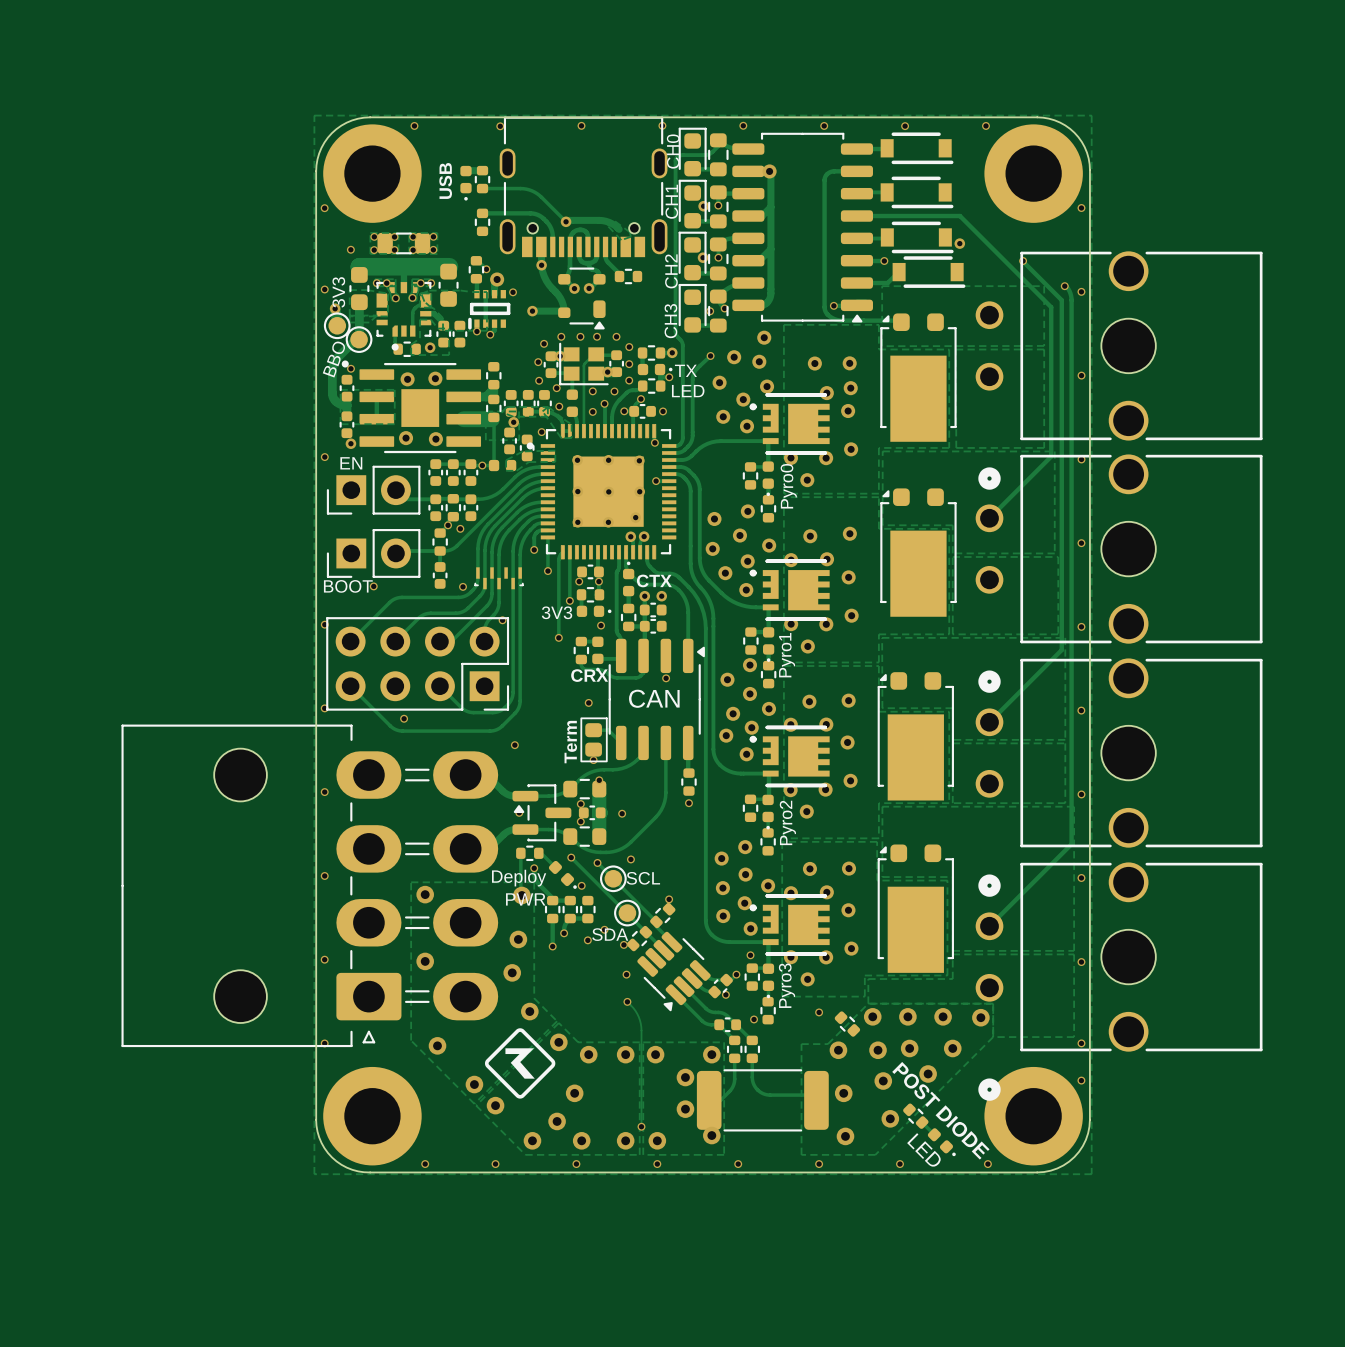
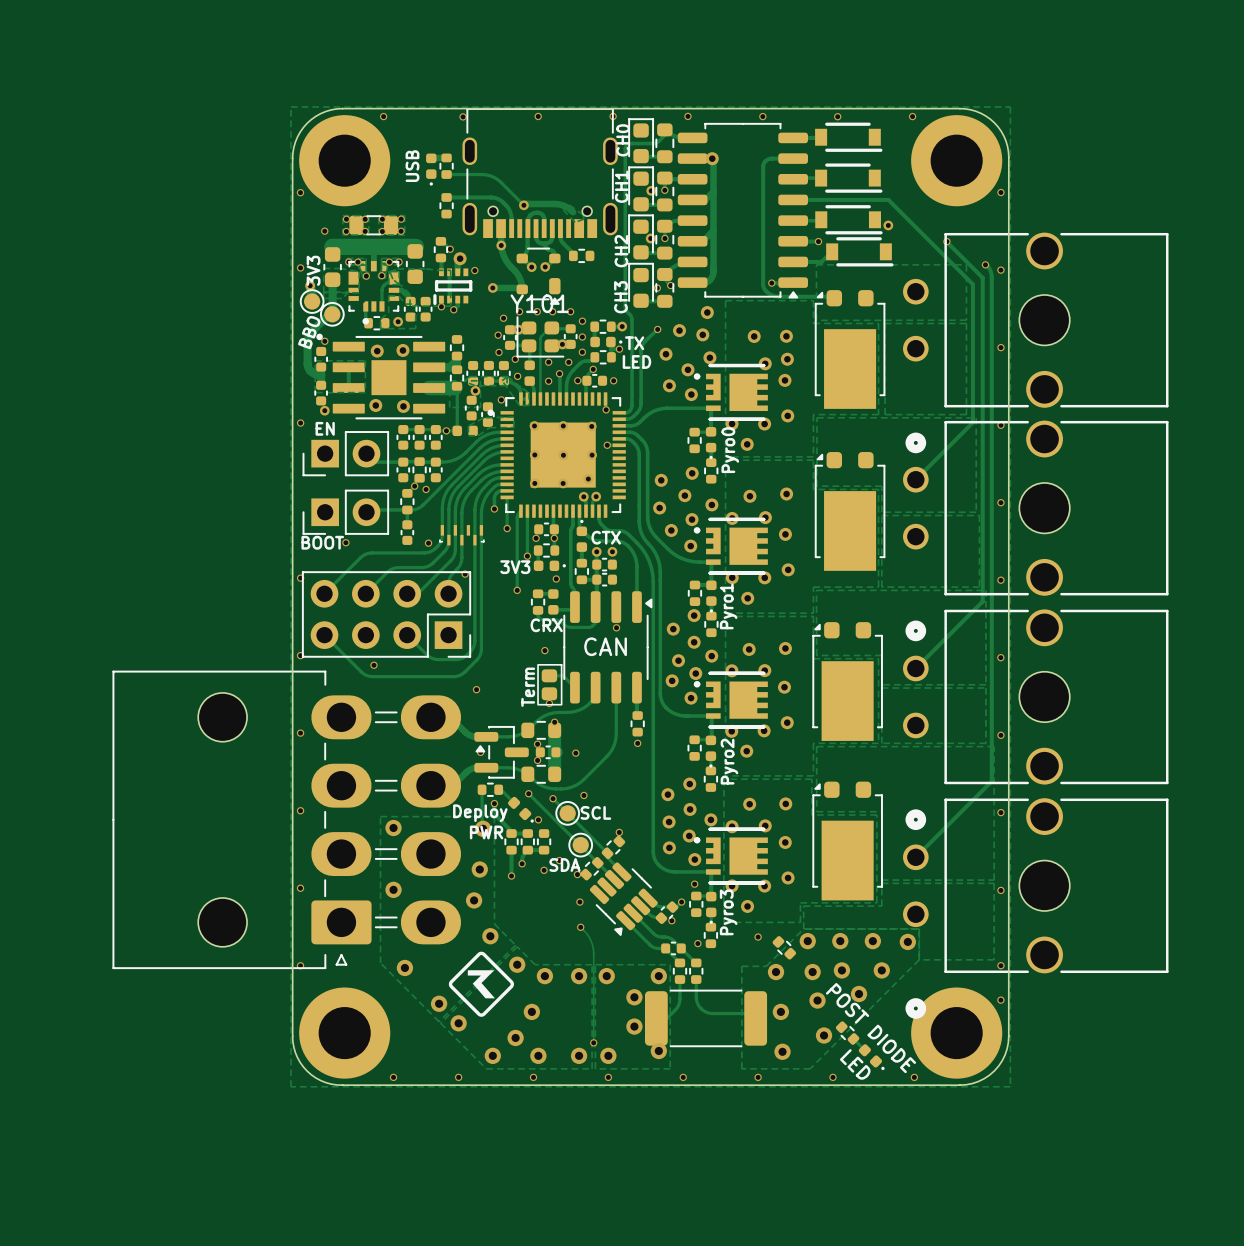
part: (583, 364) -> none
Y101: none -> (540, 336)

